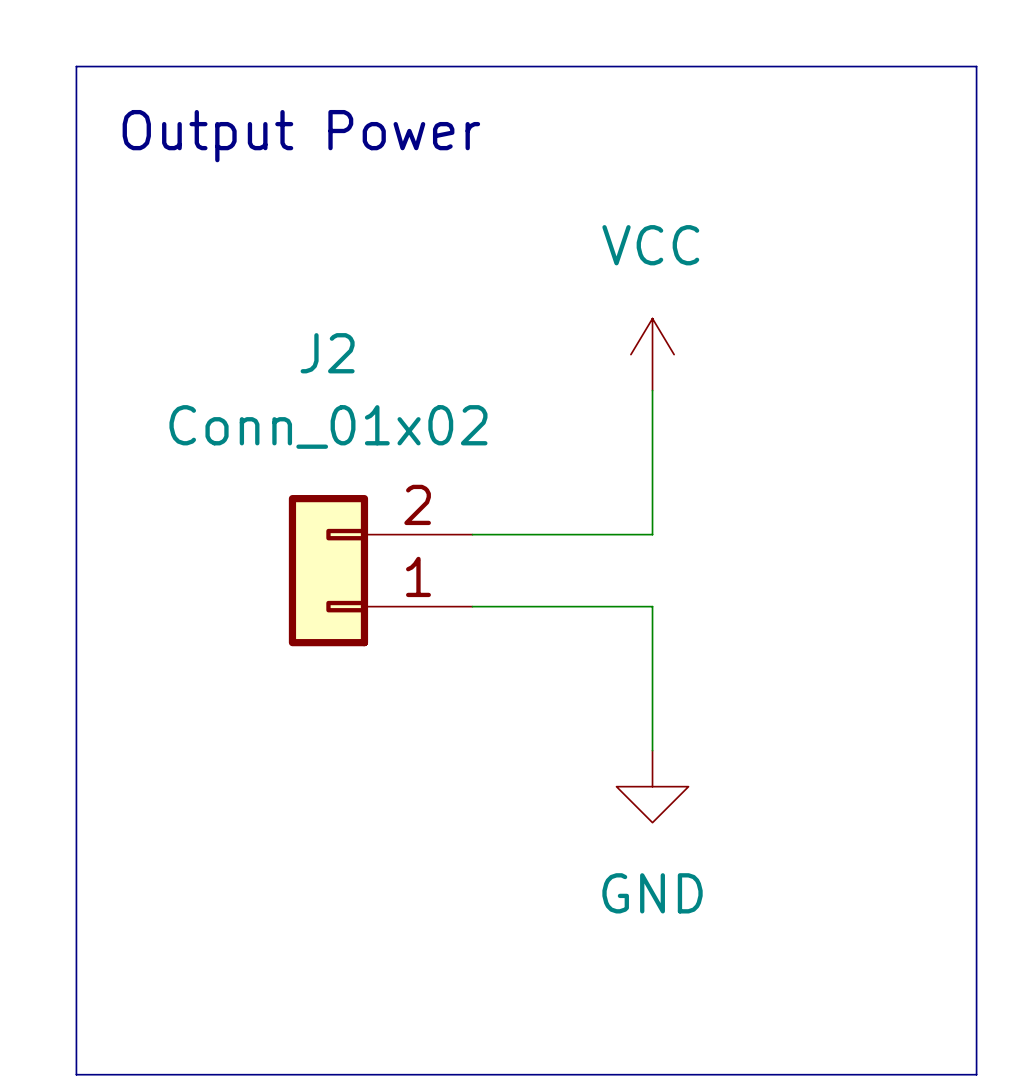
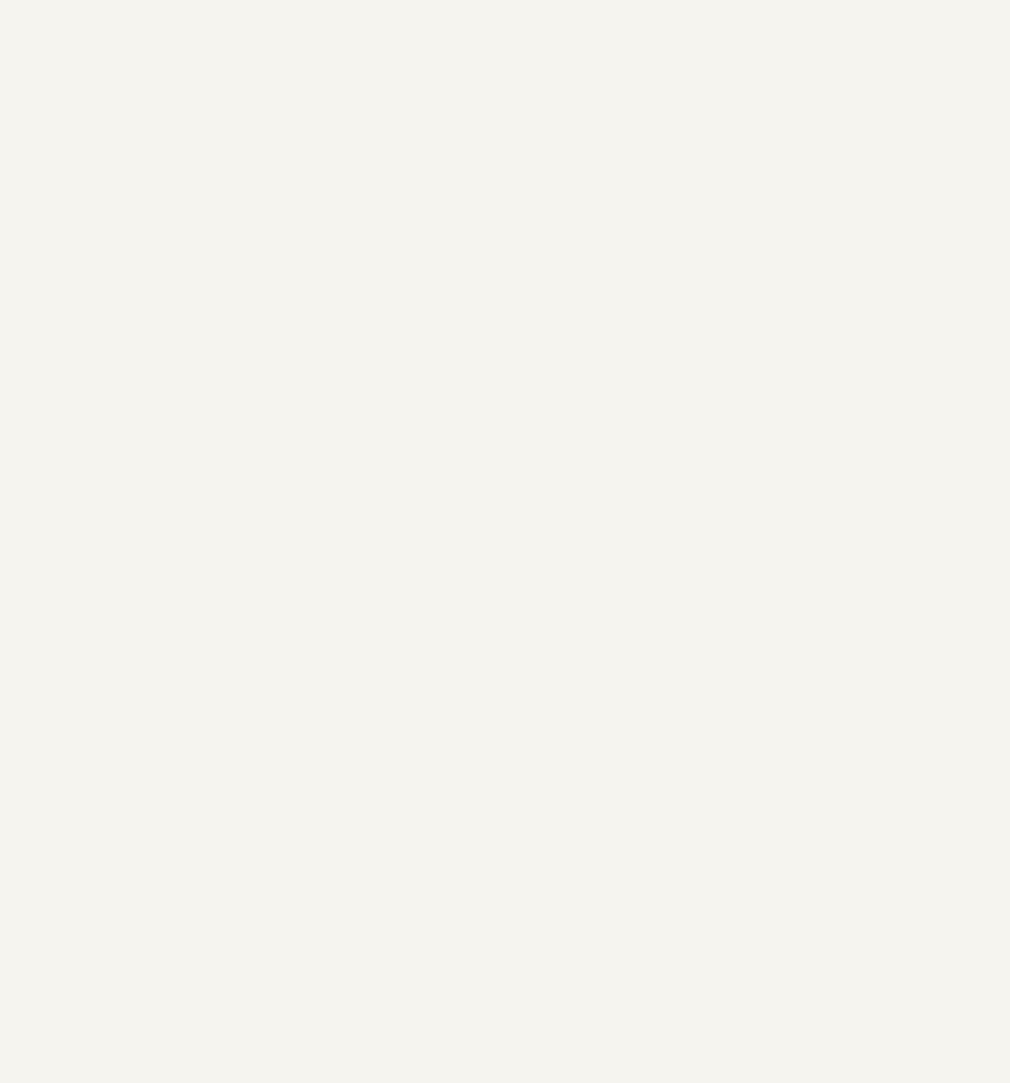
line: (76, 66) (976, 66) (976, 1074) (76, 1074) (76, 66) -> none
text: Output Power (301, 136) -> none
power symbol: VCC (652, 354) -> none
wire: (652, 390) (652, 534) (472, 534) -> none
J2: Conn_01x02 (380, 570) -> none
wire: (472, 606) (652, 606) (652, 750) -> none
power symbol: GND (652, 786) -> none

